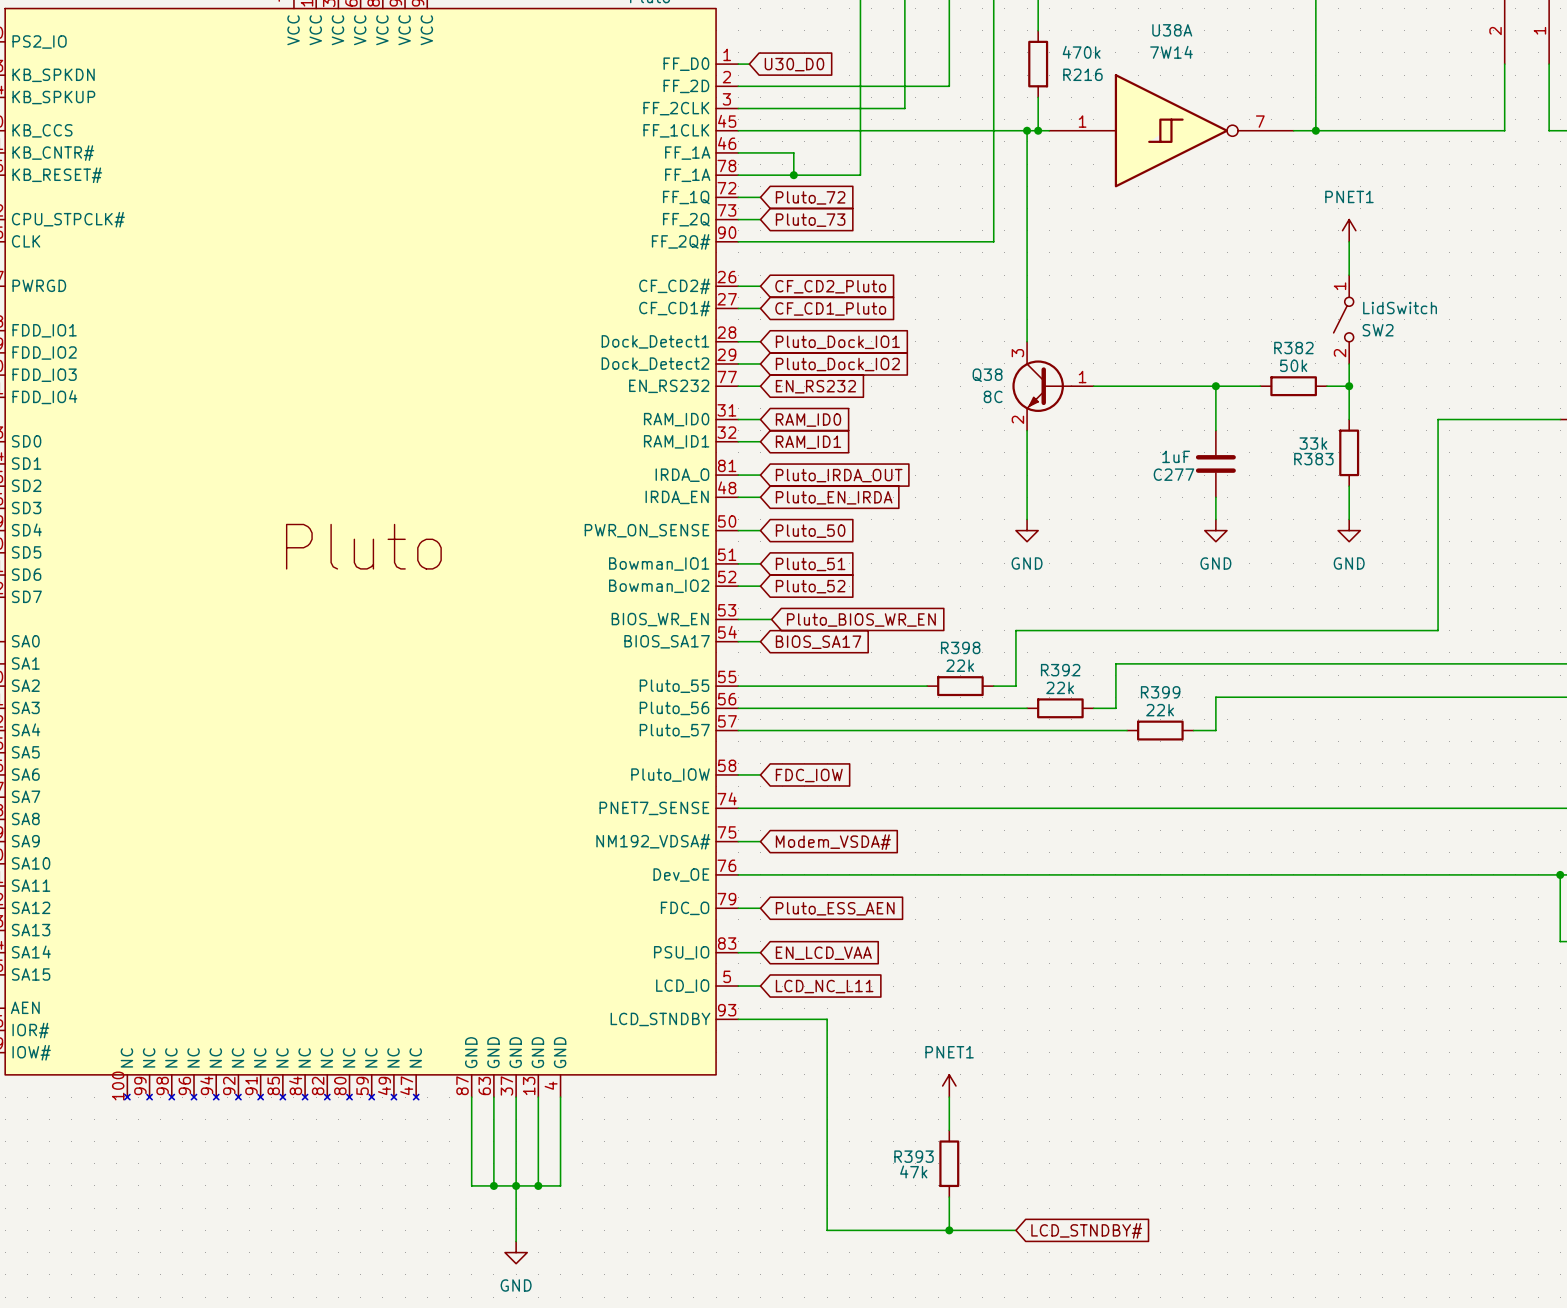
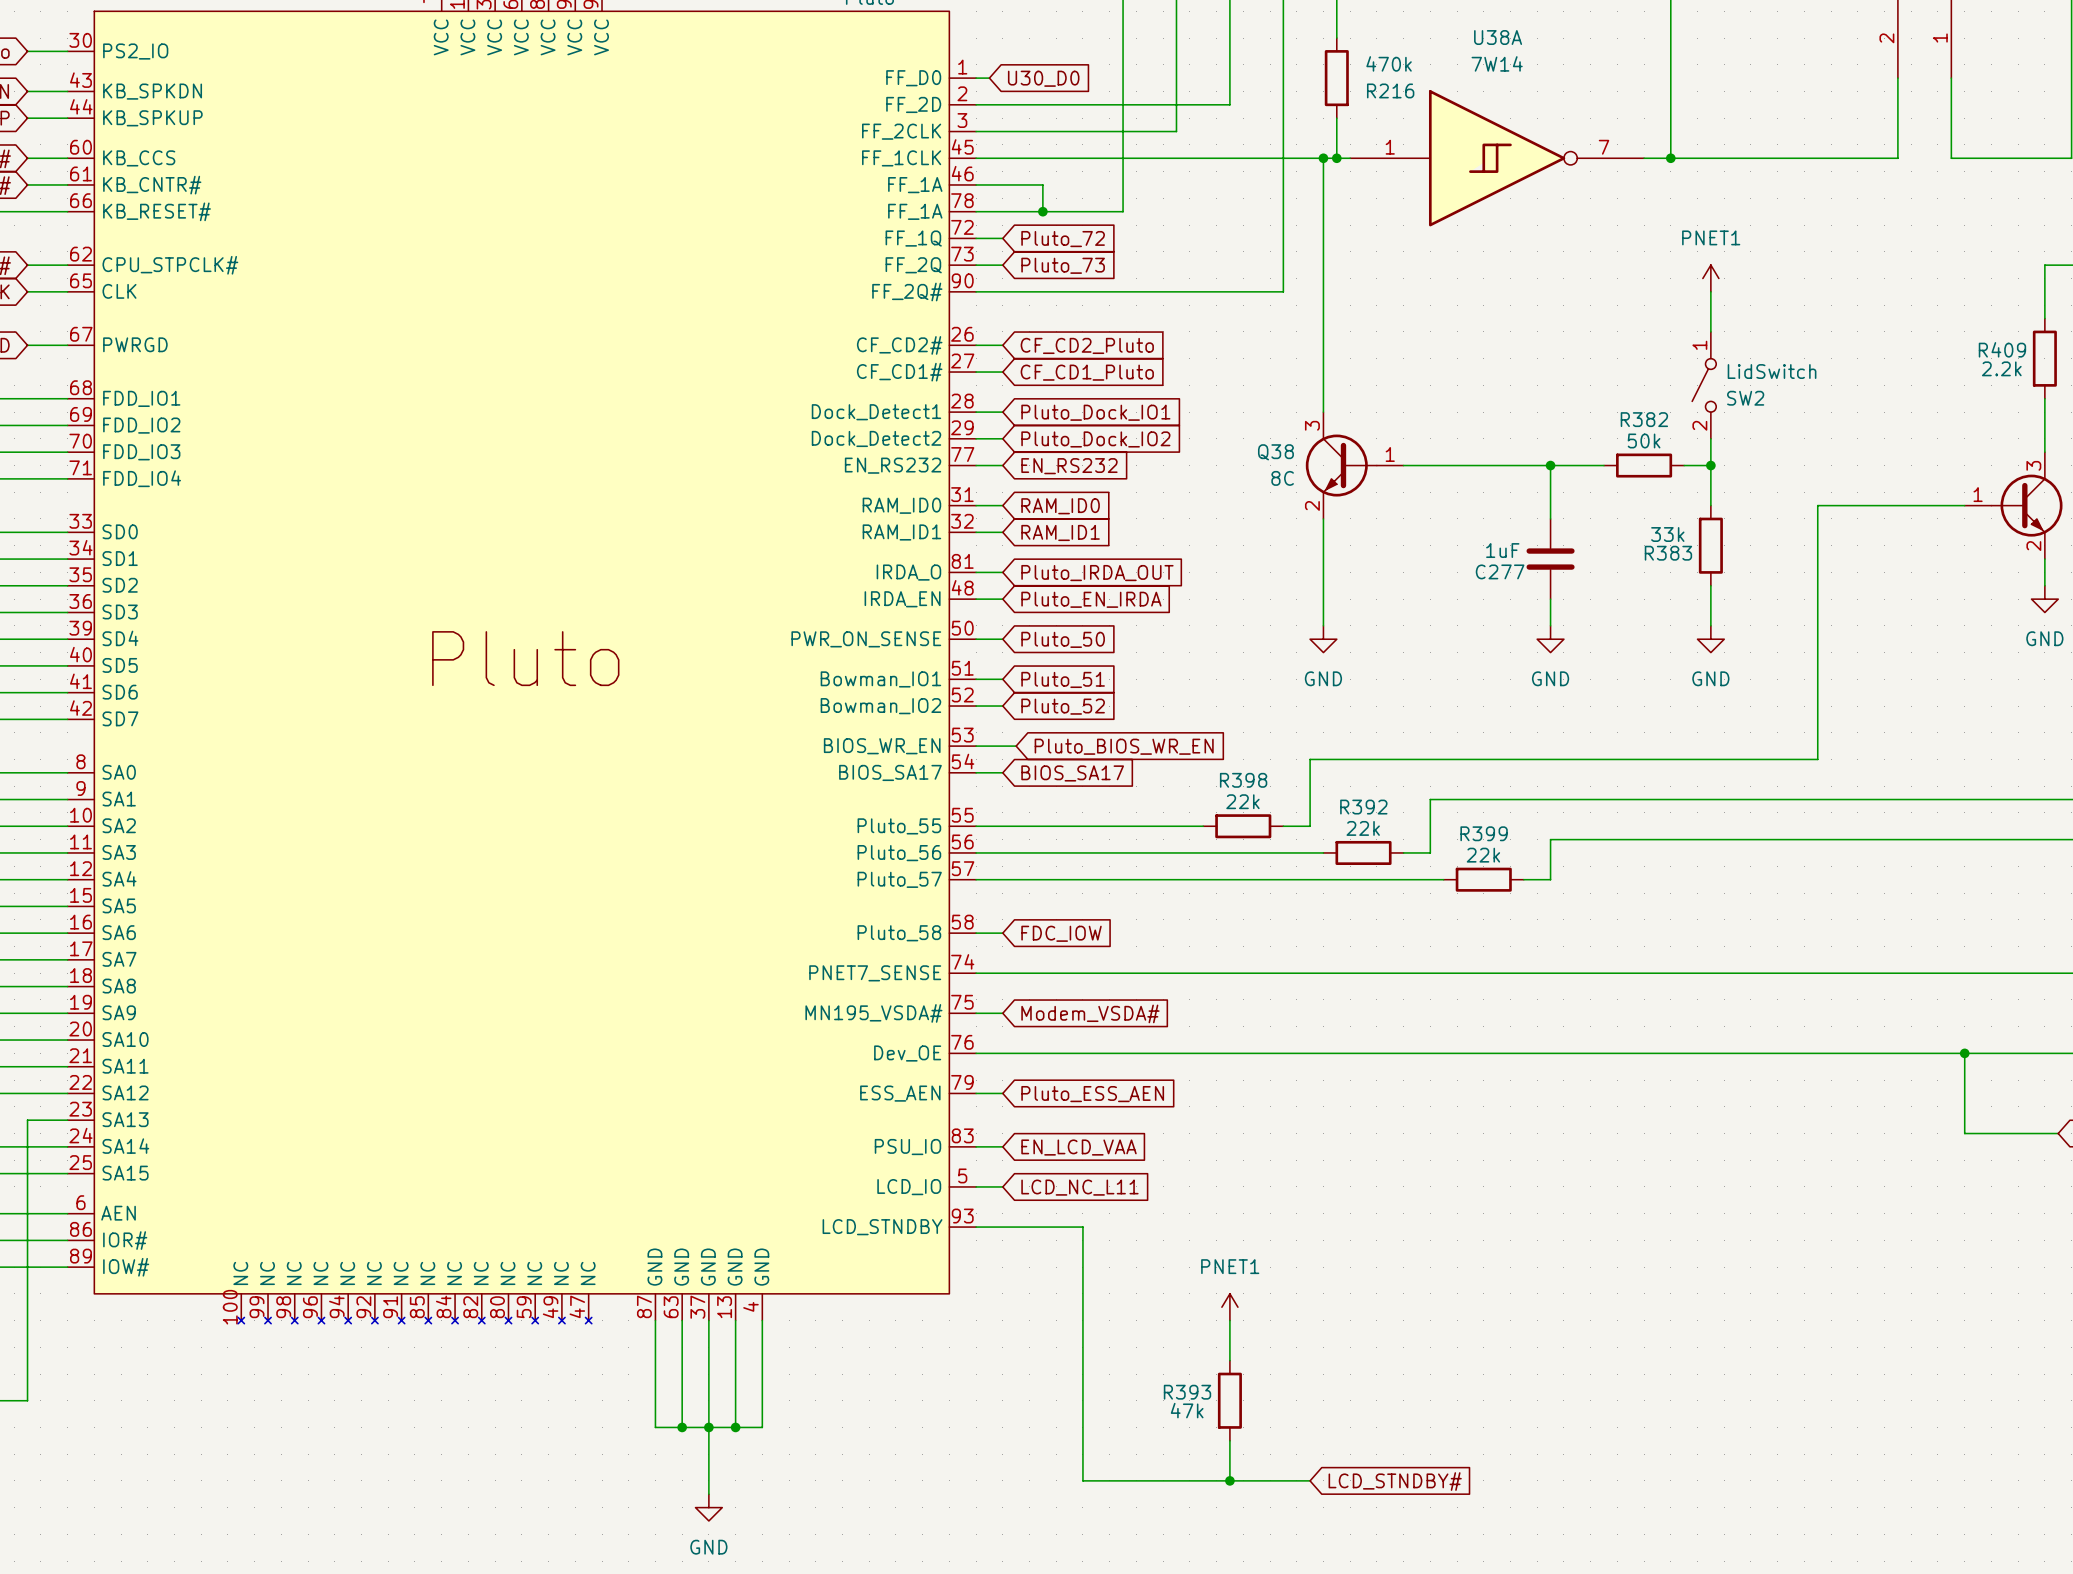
part pin name: Pluto_IOW (670, 775) -> Pluto_58 (899, 933)
part pin name: NM192_VDSA# (653, 841) -> MN195_VSDA# (873, 1013)
part pin name: FDC_O (685, 908) -> ESS_AEN (900, 1093)

